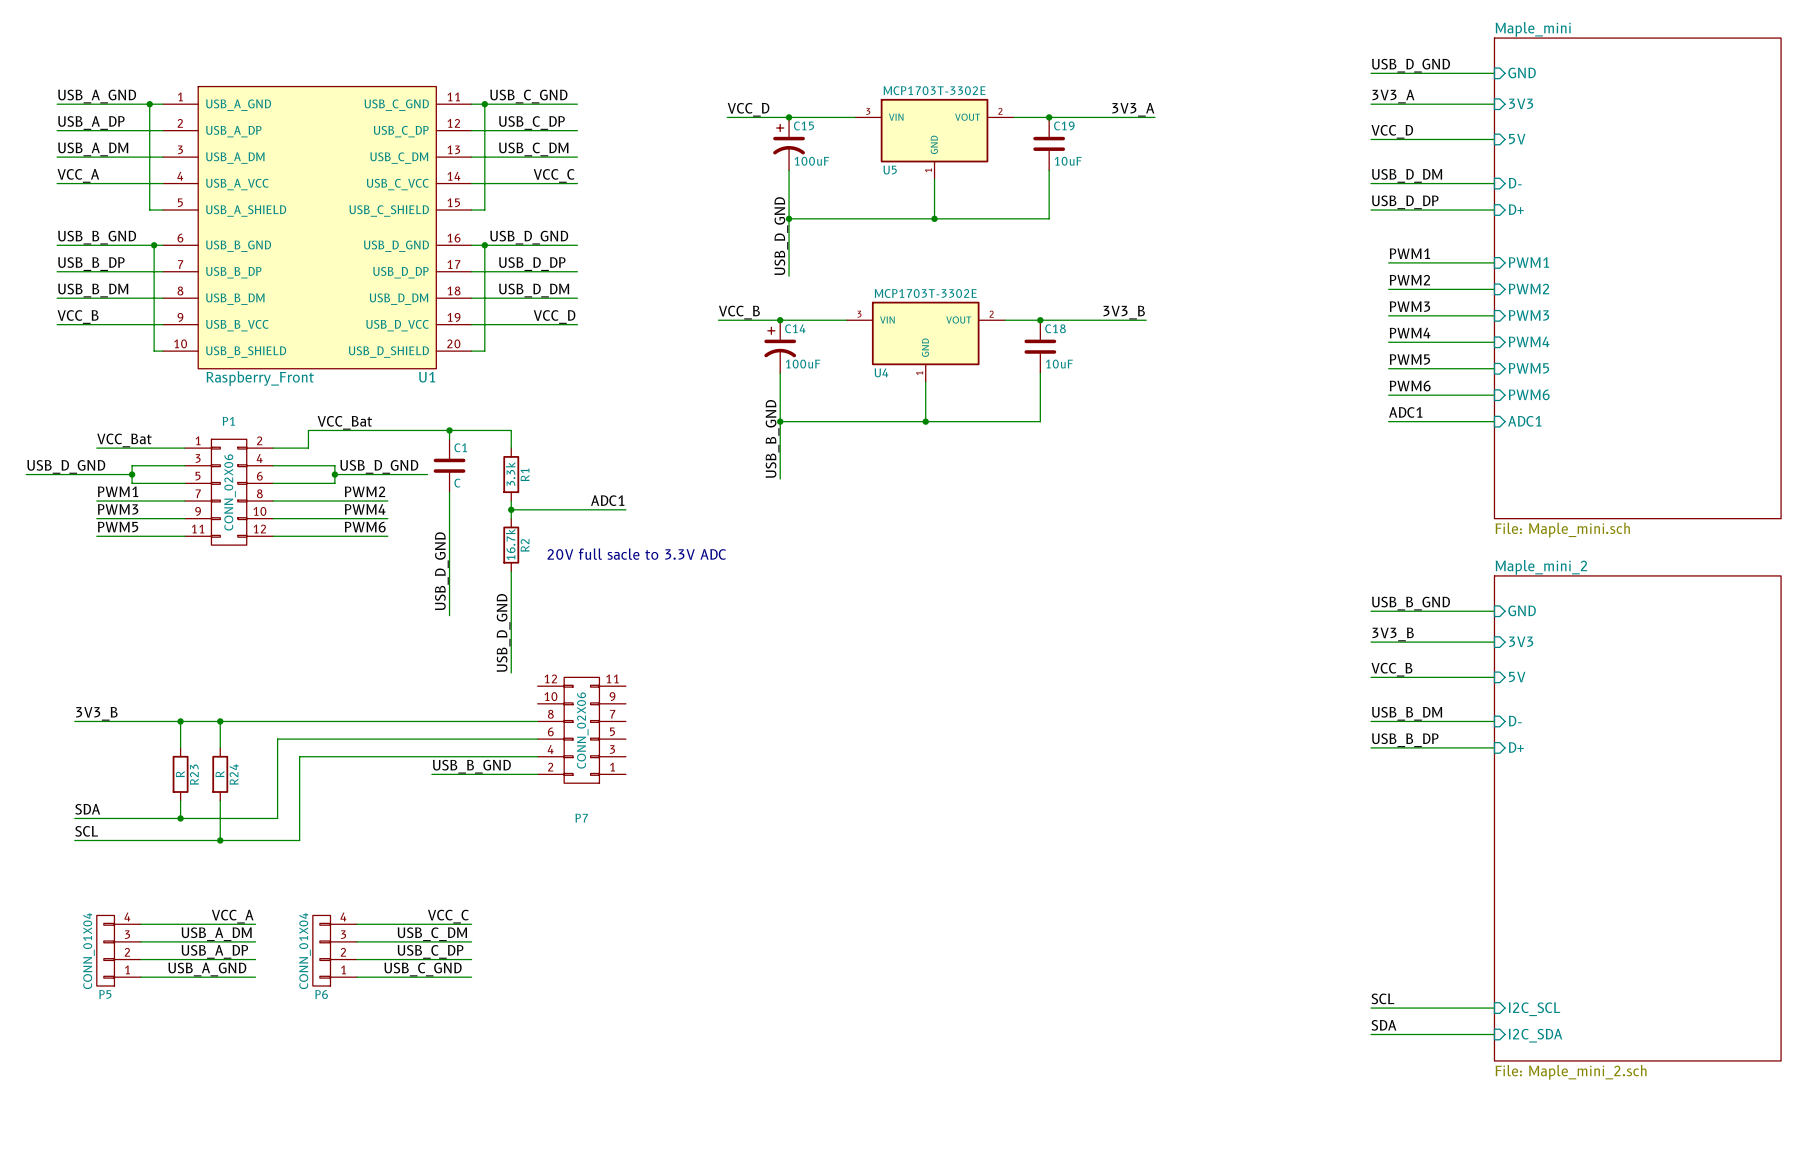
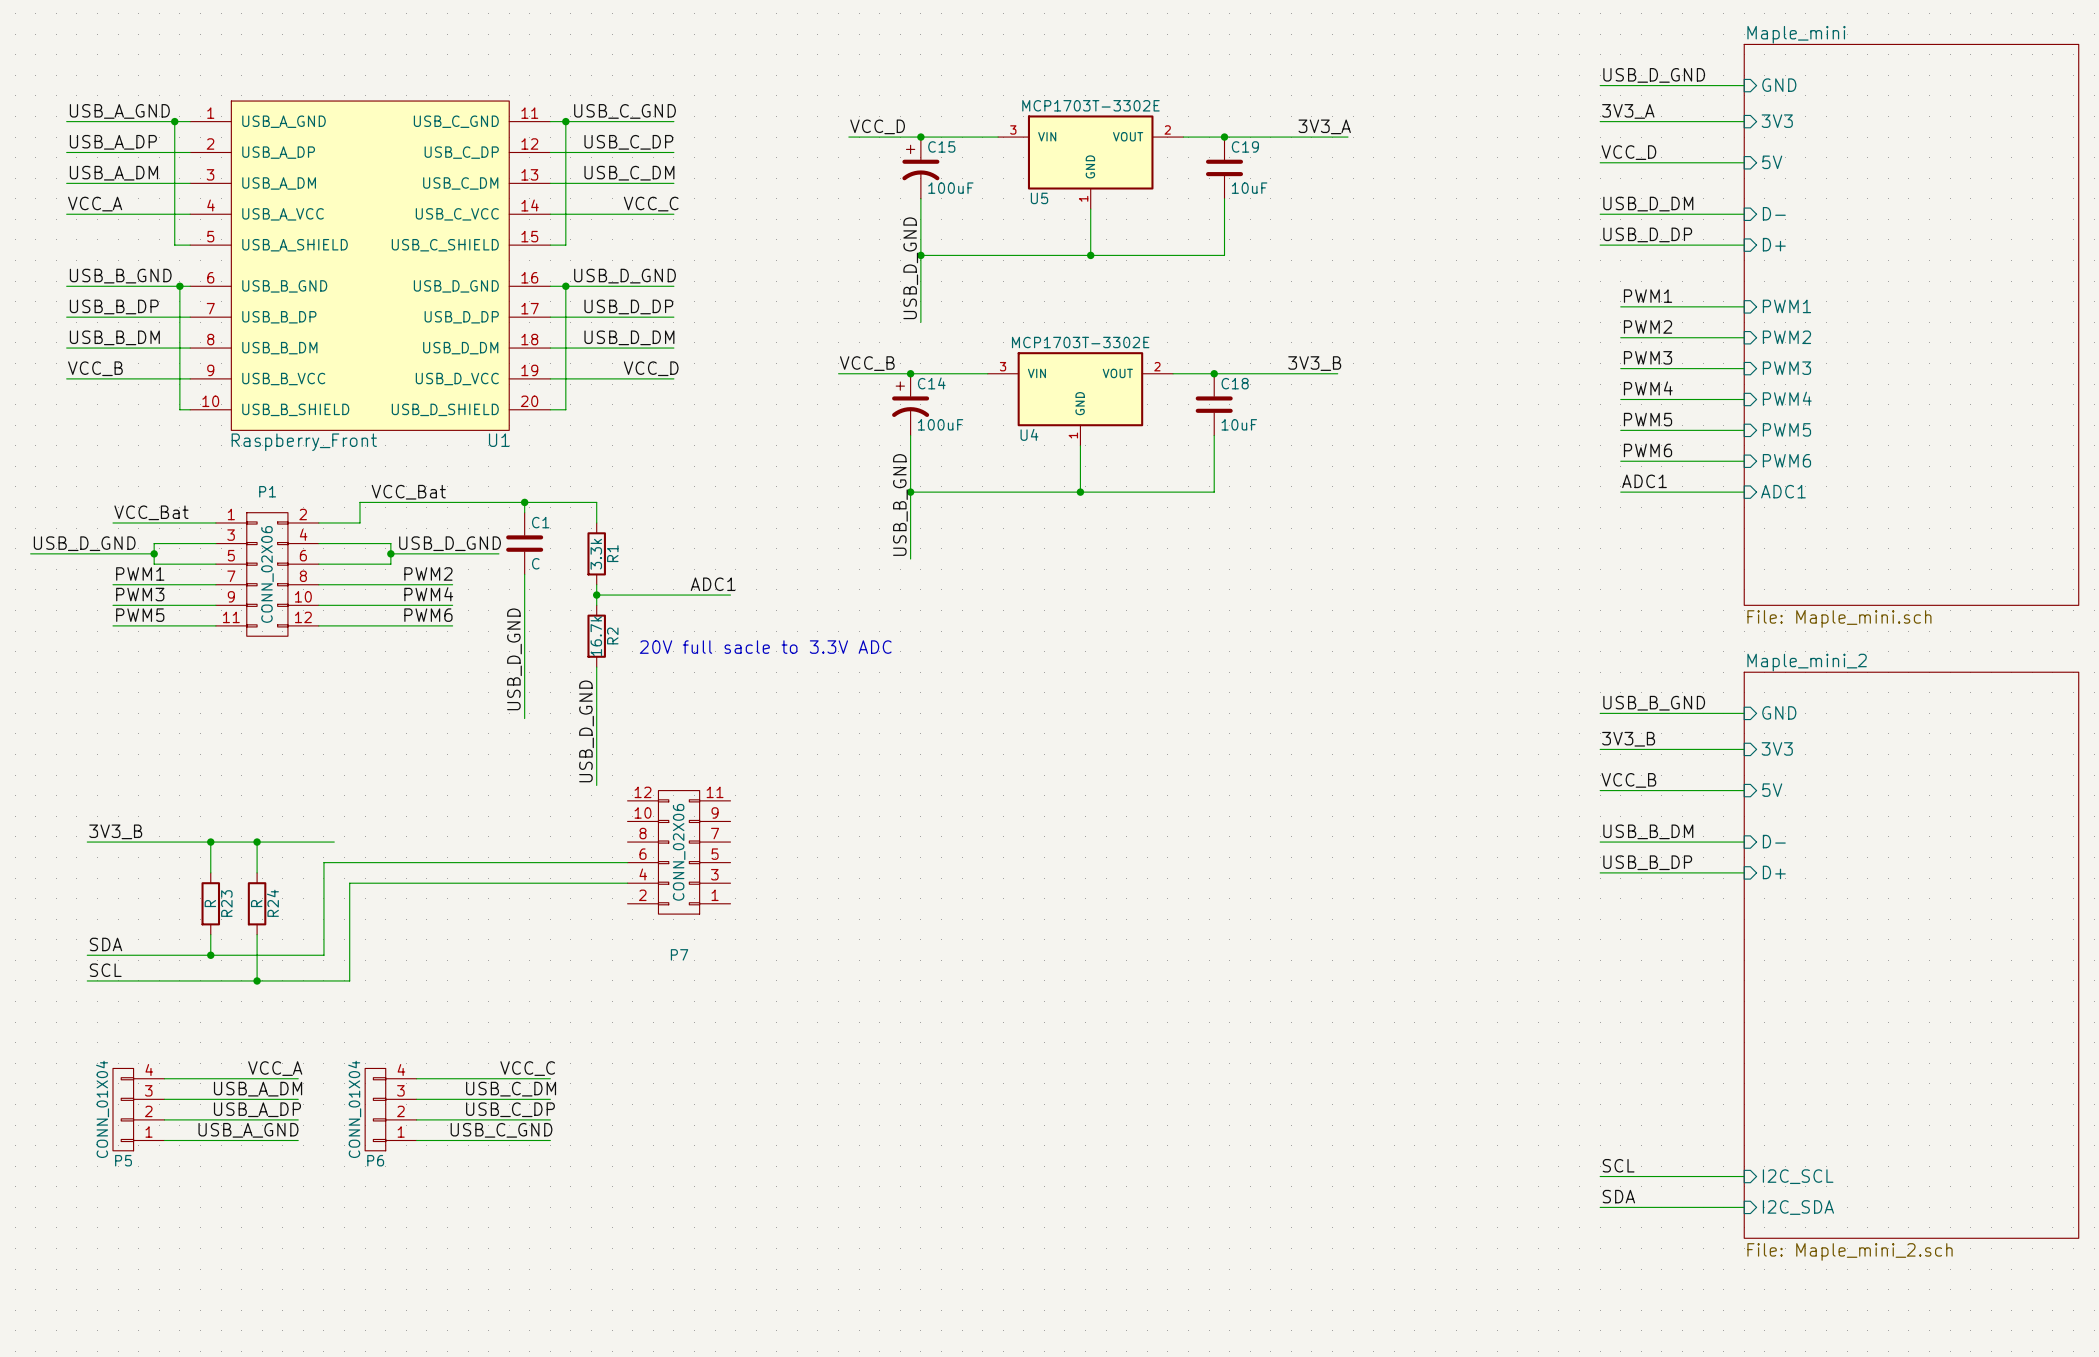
wire: (286, 721) (537, 721) -> none
label: USB_B_GND (471, 766) -> none
wire: (431, 774) (537, 774) -> none

